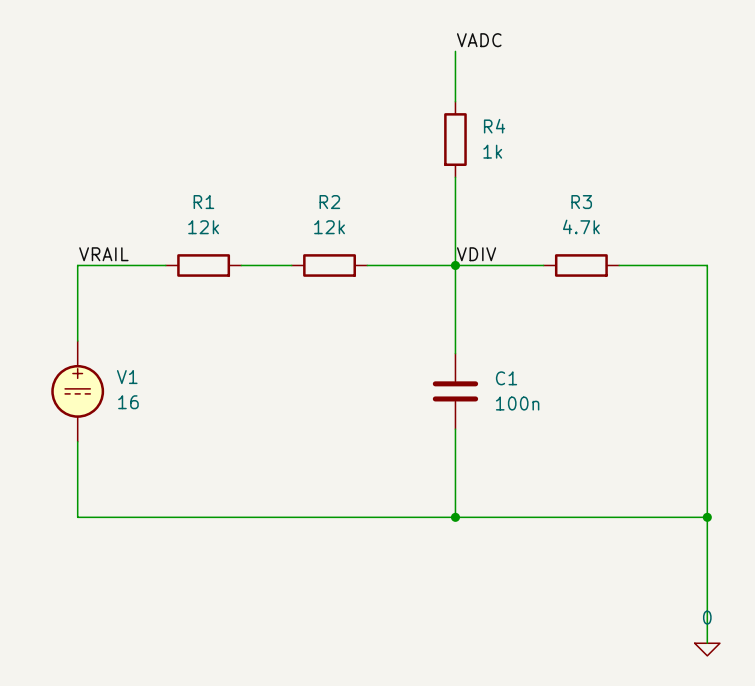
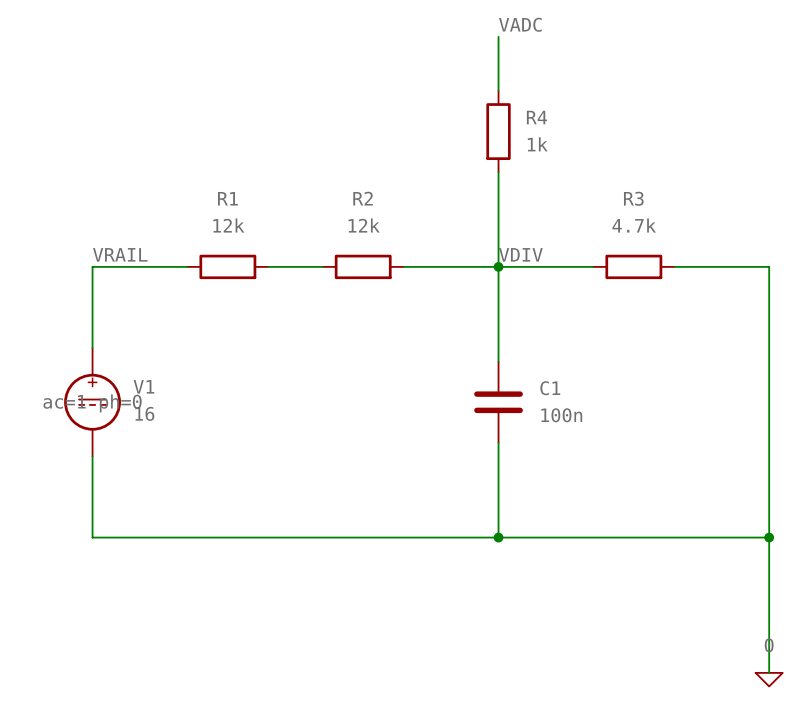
V1 text: none -> ac=1 ph=0 (92, 403)

